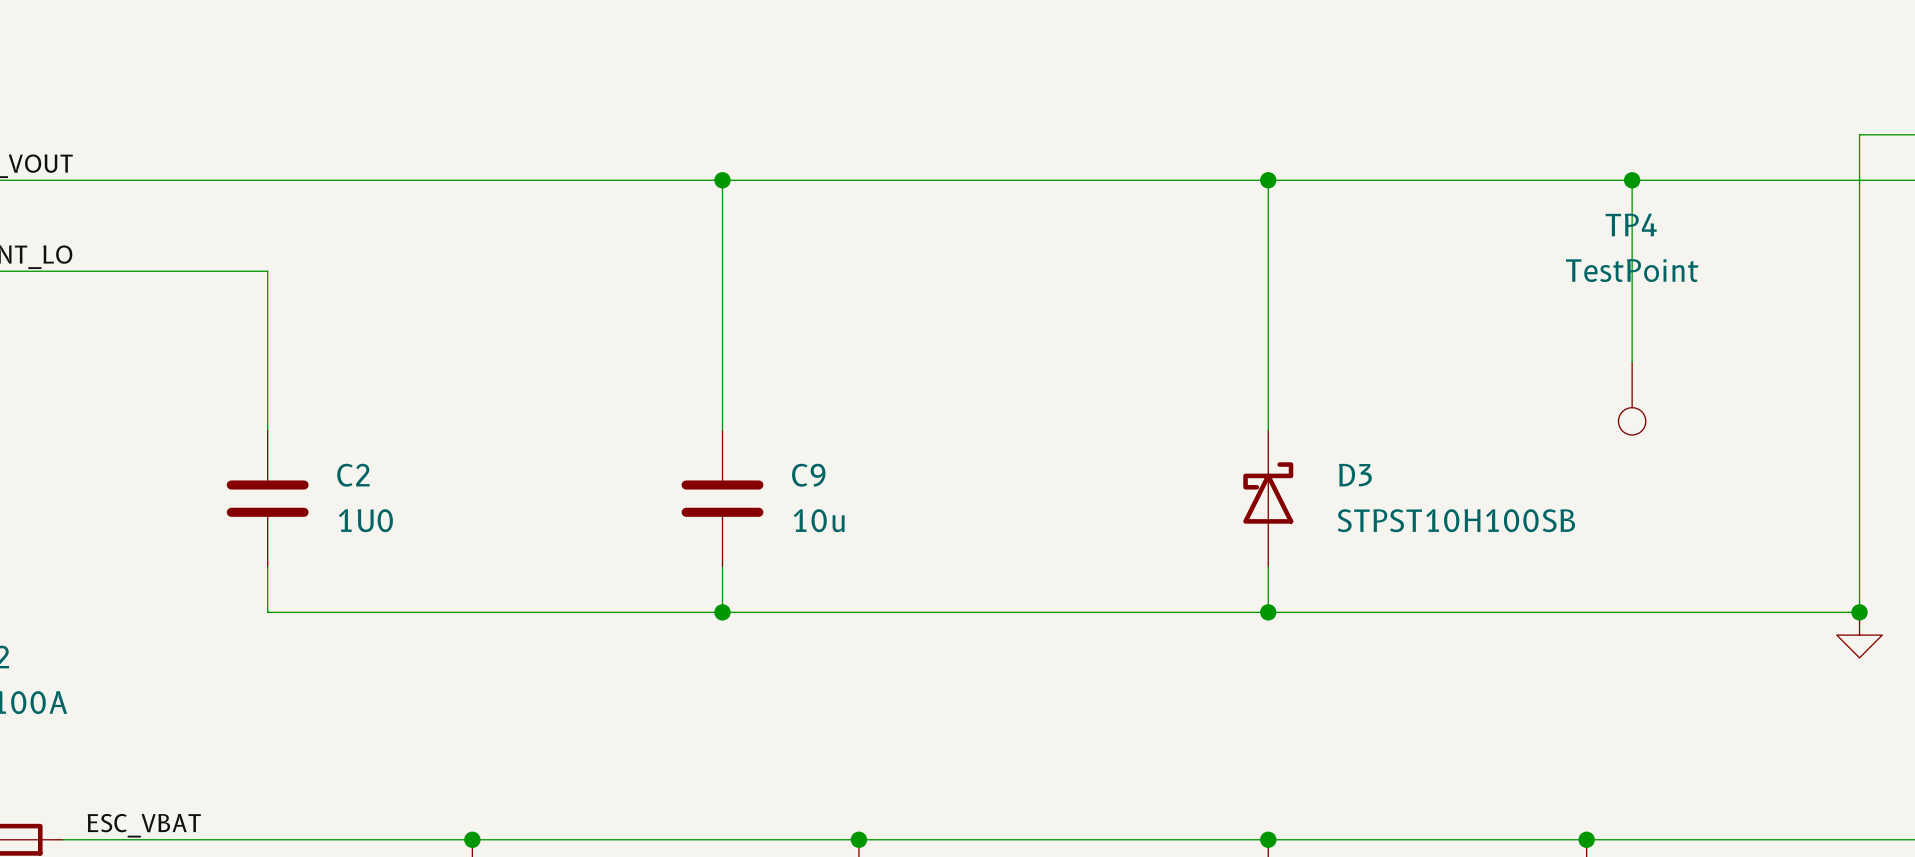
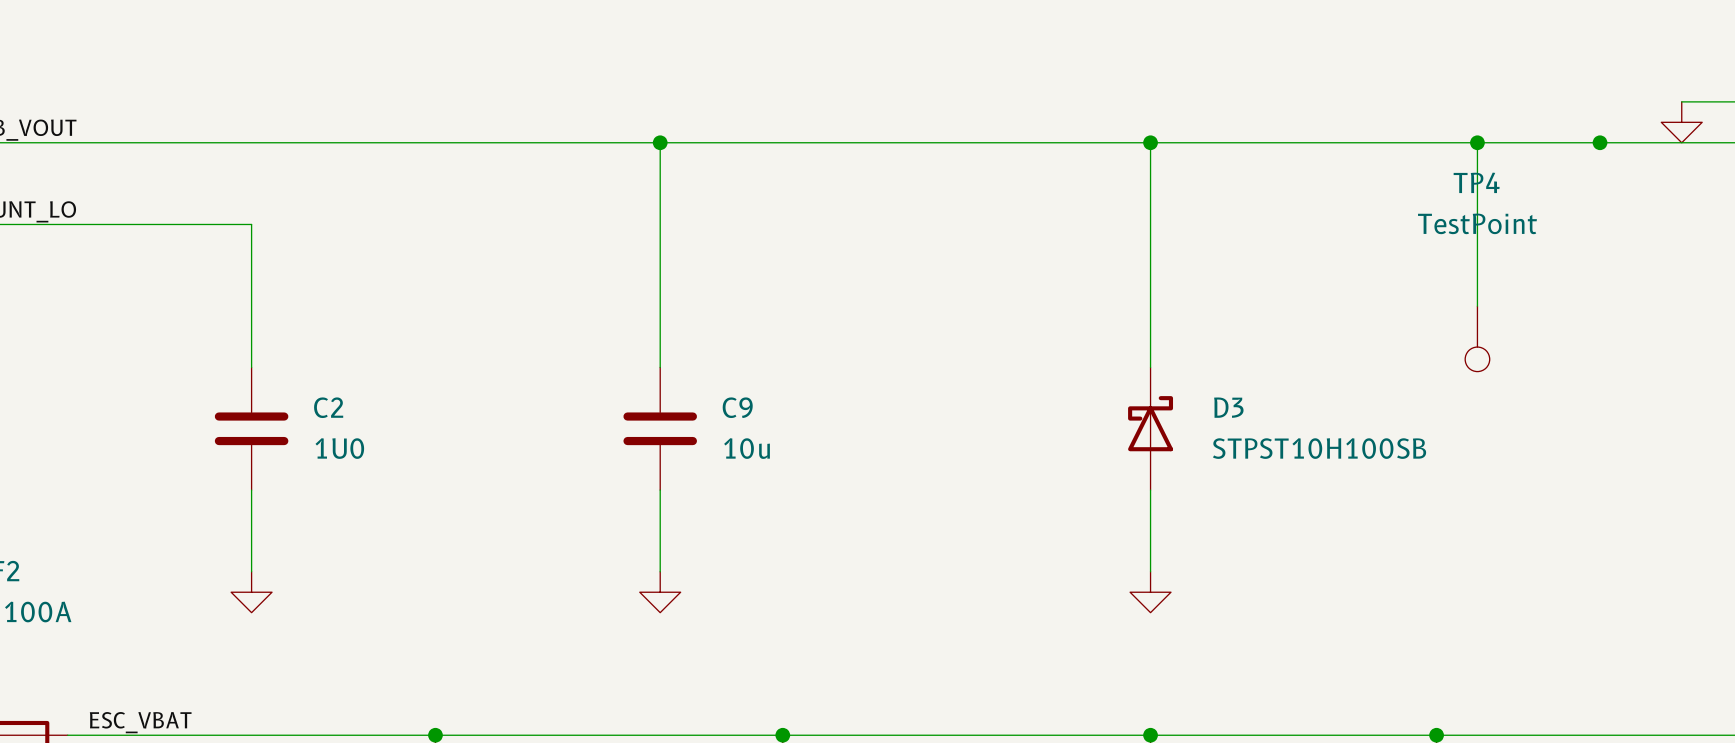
wire: (1859, 134) (1859, 612) (267, 612) -> (251, 571) (251, 530)
power symbol: none -> (1681, 122)
junction: none -> (1600, 142)
wire: none -> (660, 530) (660, 571)
junction: (722, 612) -> none
wire: none -> (1150, 530) (1150, 571)
junction: (1268, 612) -> none
junction: (1859, 612) -> none
power symbol: (1859, 635) -> none
power symbol: none -> (251, 592)
power symbol: none -> (660, 592)
power symbol: none -> (1150, 592)

